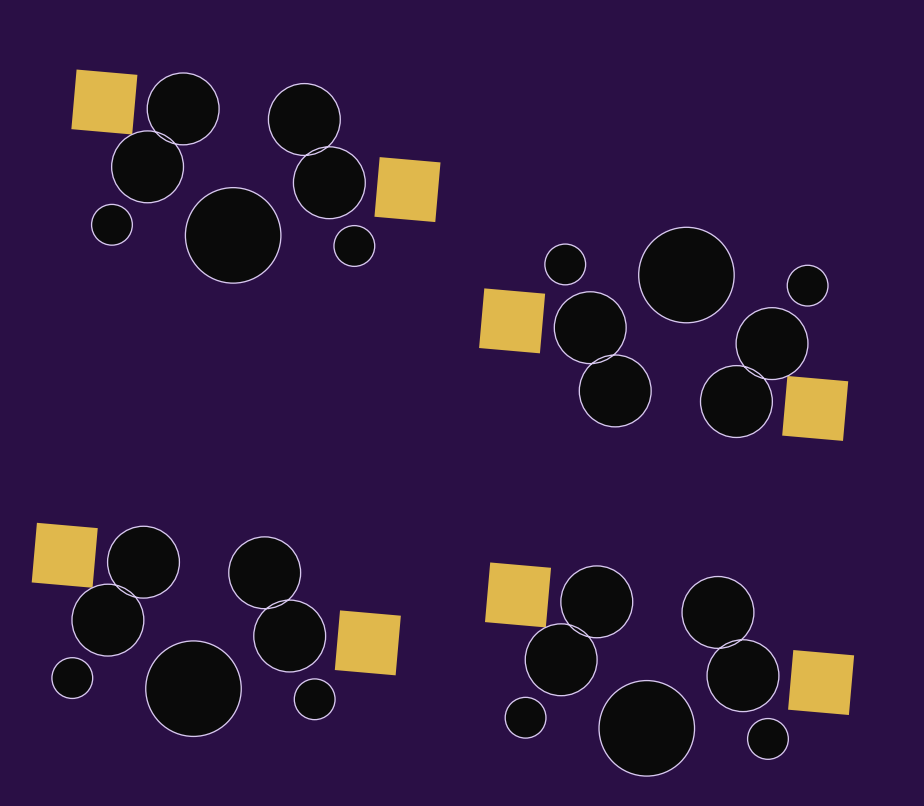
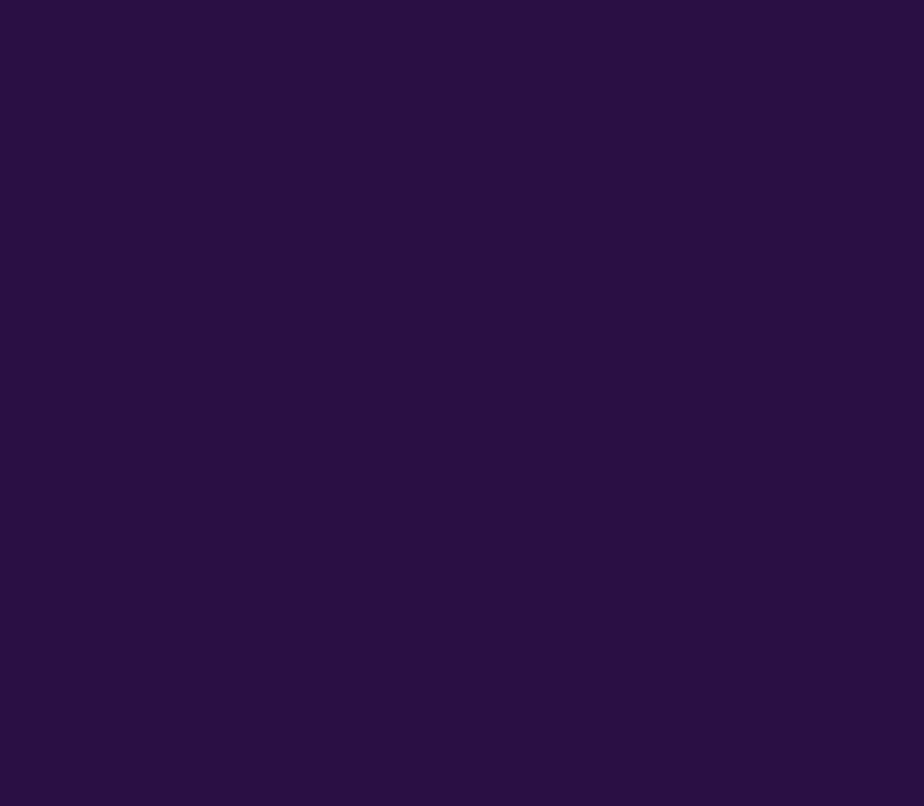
part: (255, 176) -> none
part: (663, 334) -> none
part: (216, 629) -> none
part: (669, 669) -> none

